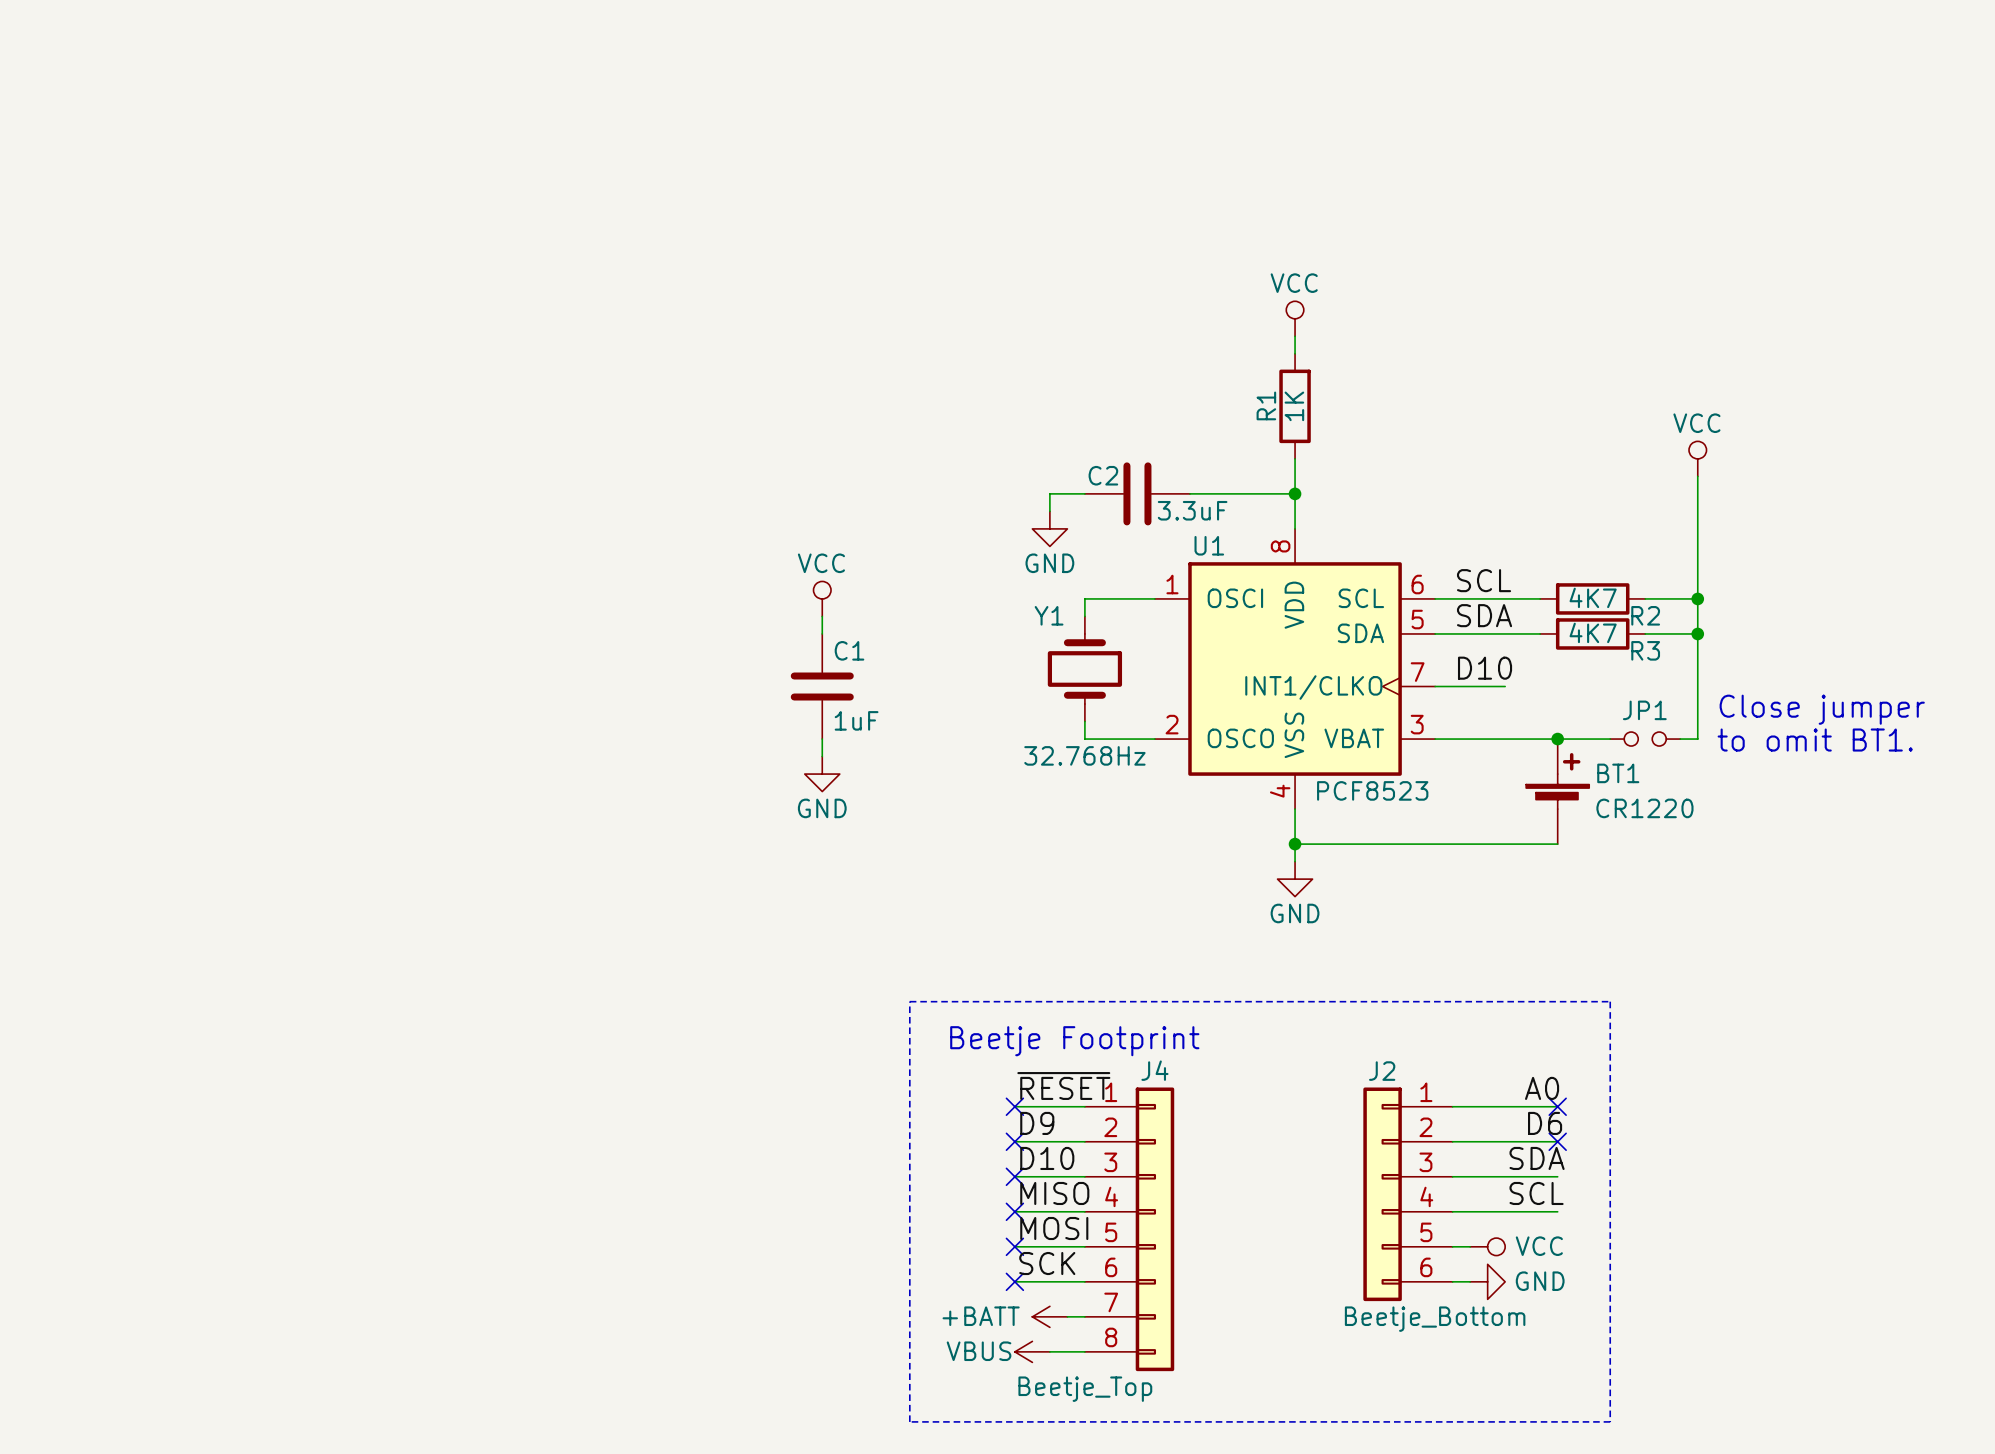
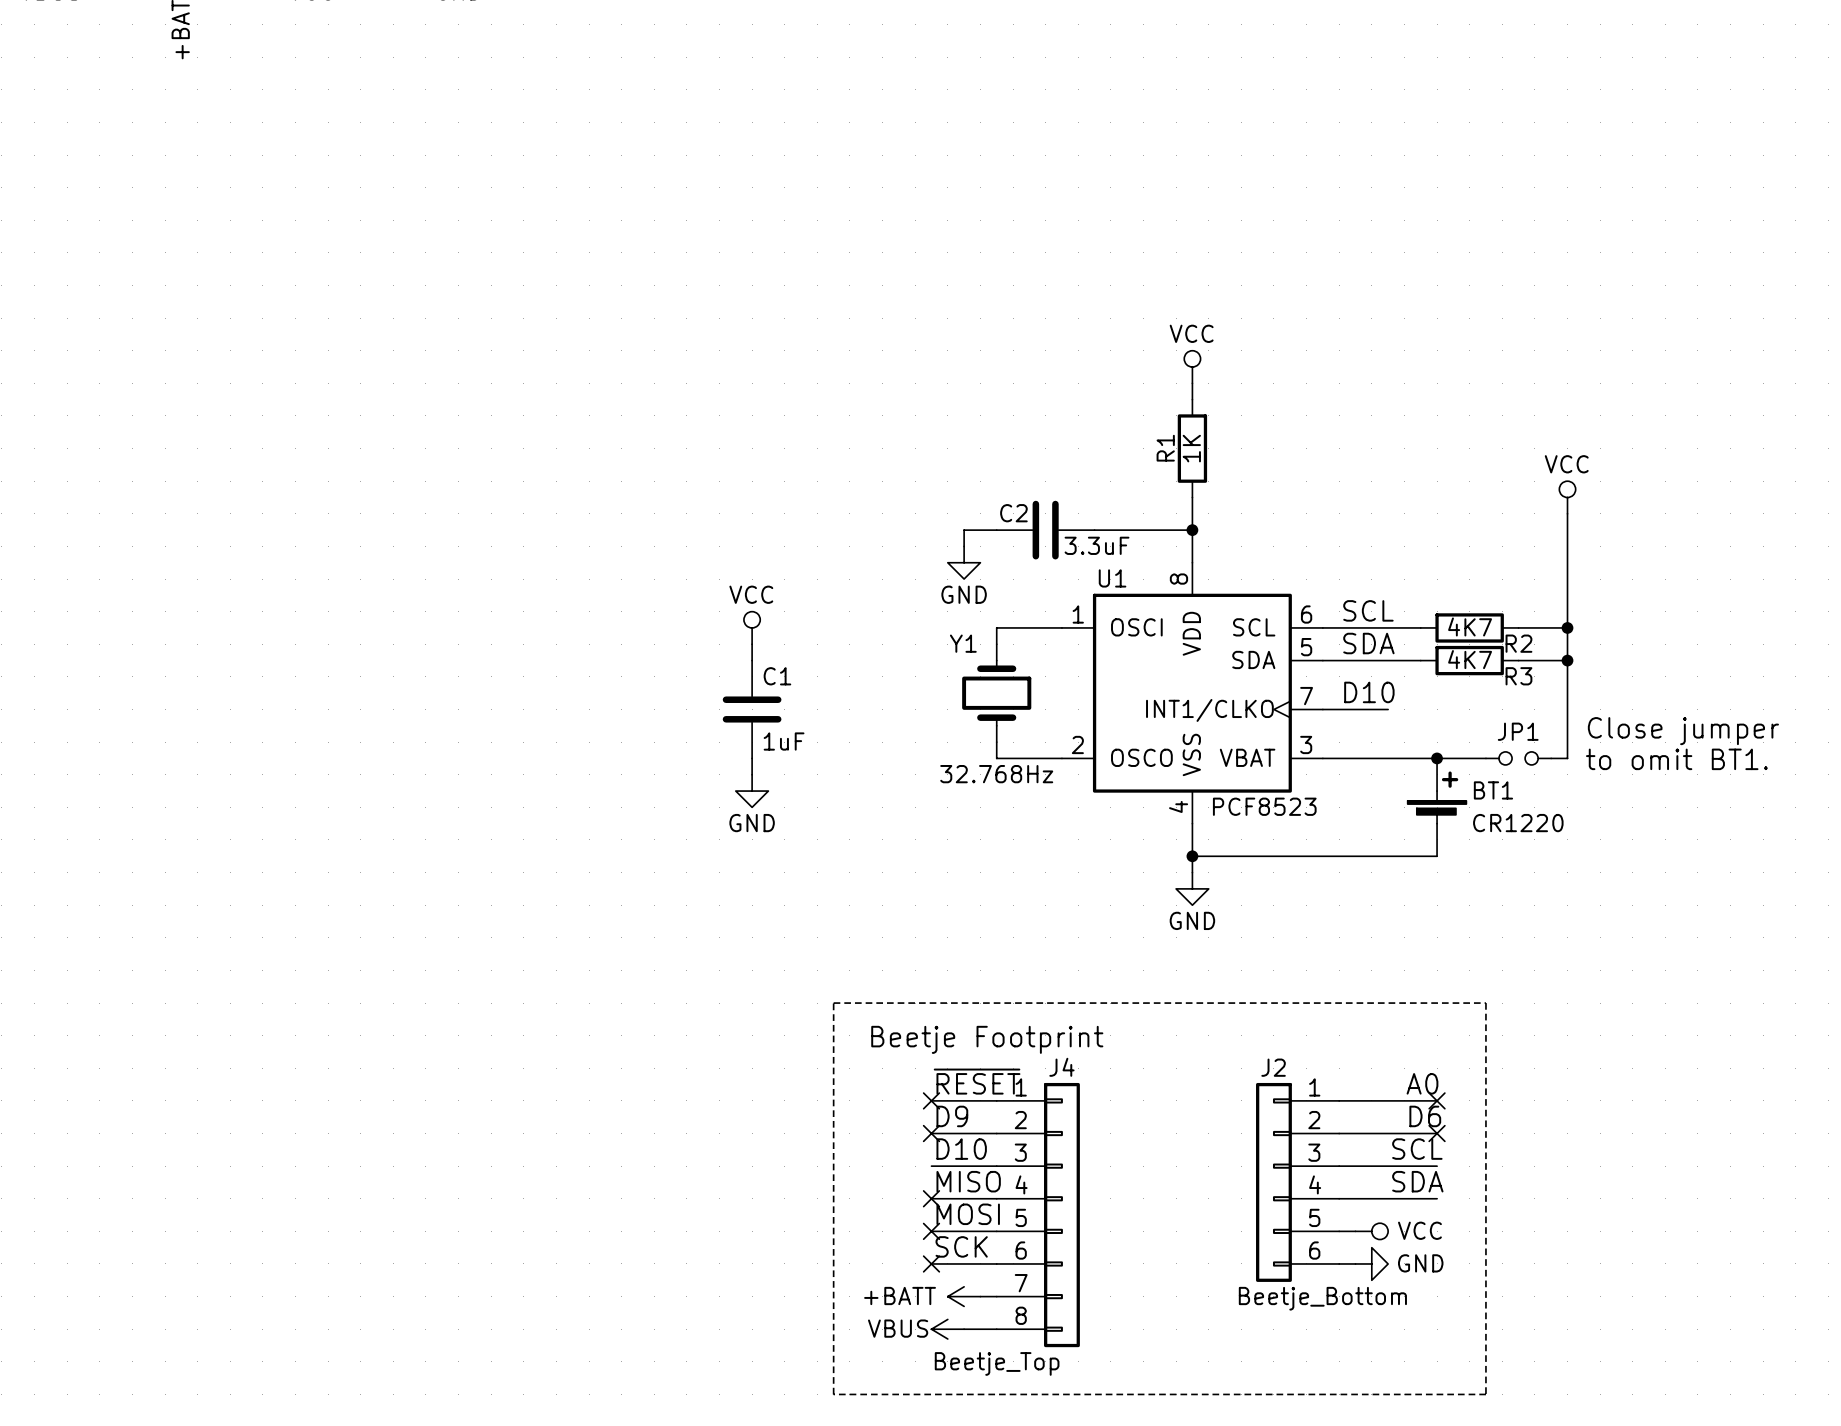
label: SDA (1537, 1158) -> SCL (1417, 1149)
no-connect mark: (1014, 1176) -> none
label: SCL (1536, 1193) -> SDA (1417, 1181)

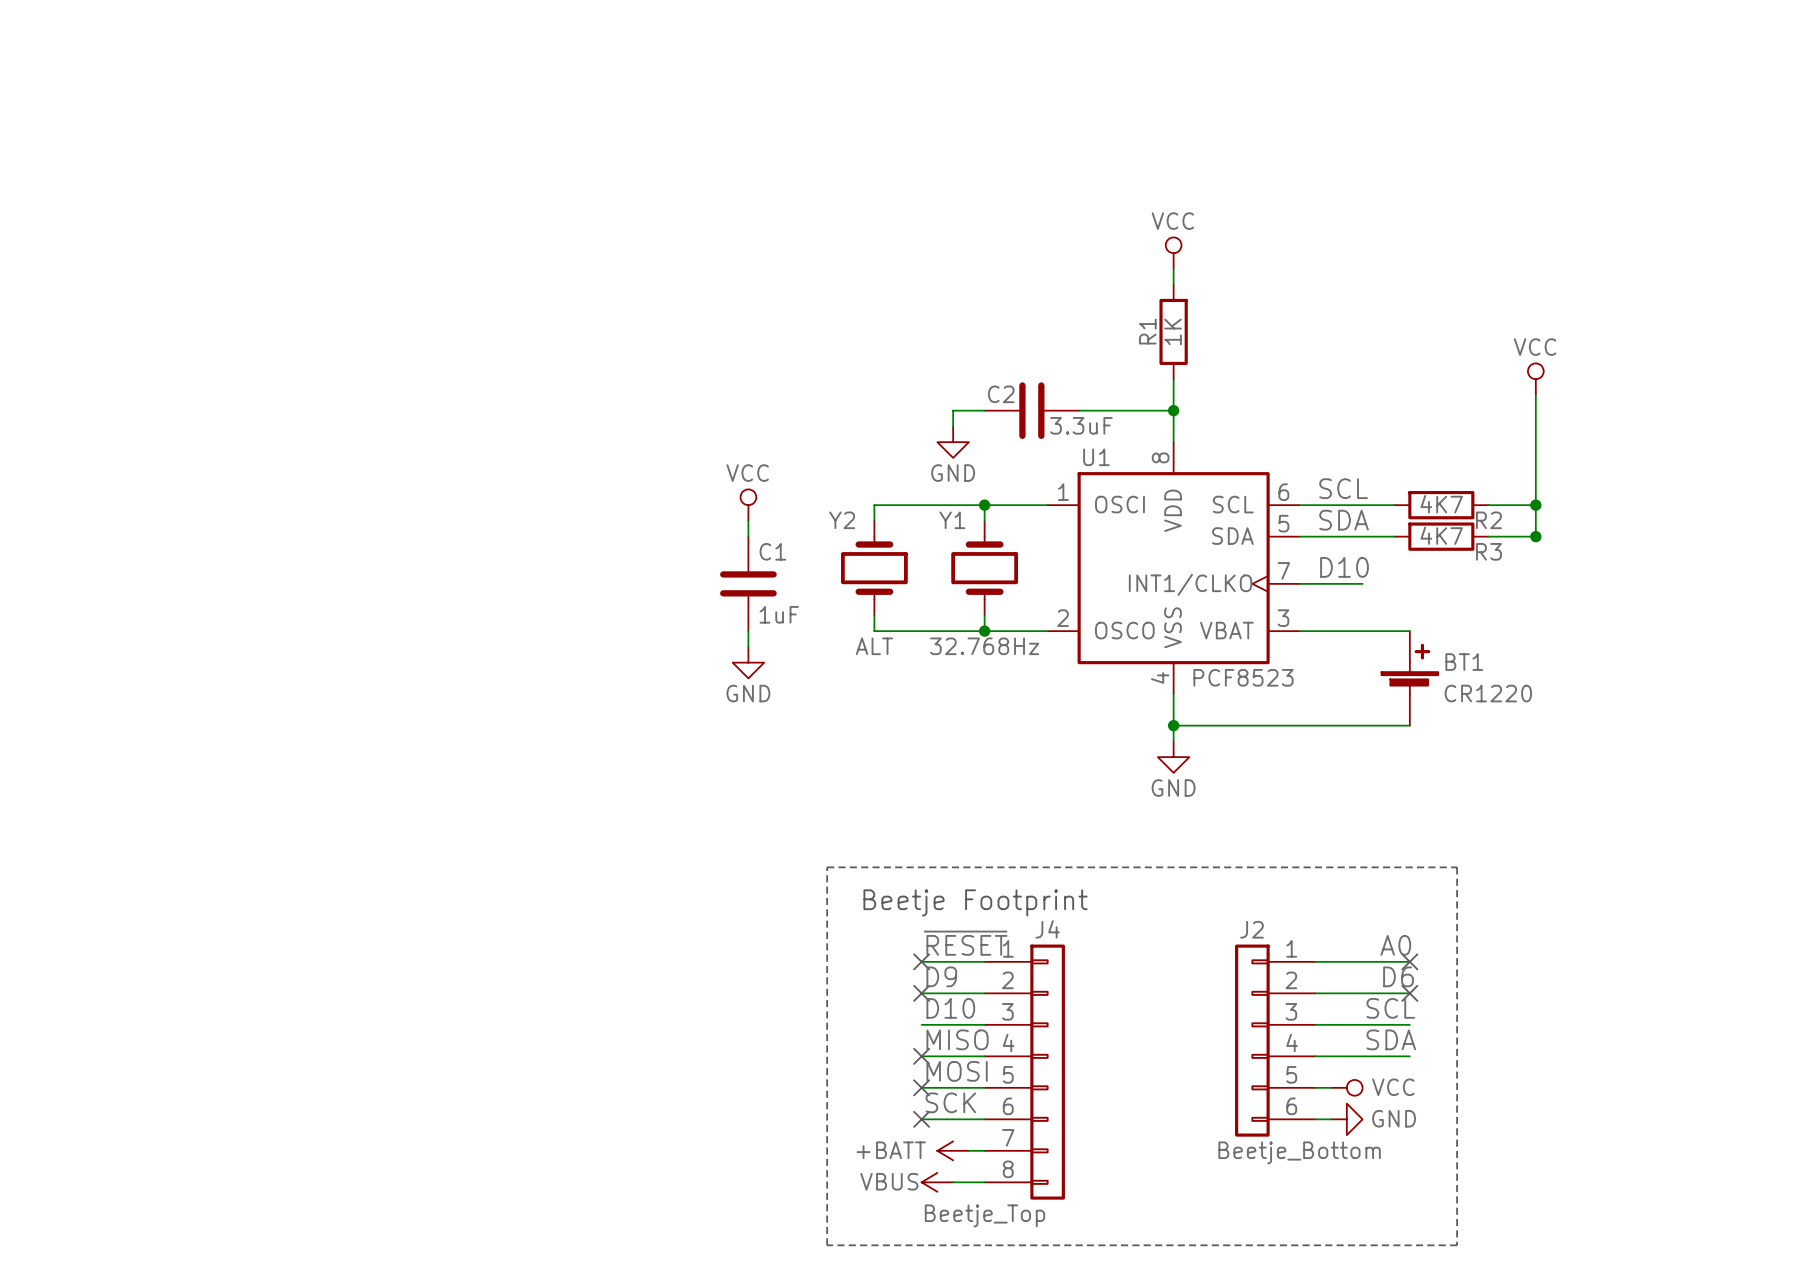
wire: none -> (984, 505) (874, 505) (874, 520)
junction: none -> (984, 505)
wire: (1567, 660) (1567, 758) (1551, 758) -> none
Y2: none -> ALT (874, 568)
text: Close jumper (1683, 731) -> none
wire: none -> (874, 615) (874, 631) (984, 631)
junction: none -> (984, 631)
wire: (1437, 758) (1485, 758) -> none
junction: (1437, 758) -> none
JP1: (1518, 758) -> none
text: to omit BT1. (1676, 759) -> none

